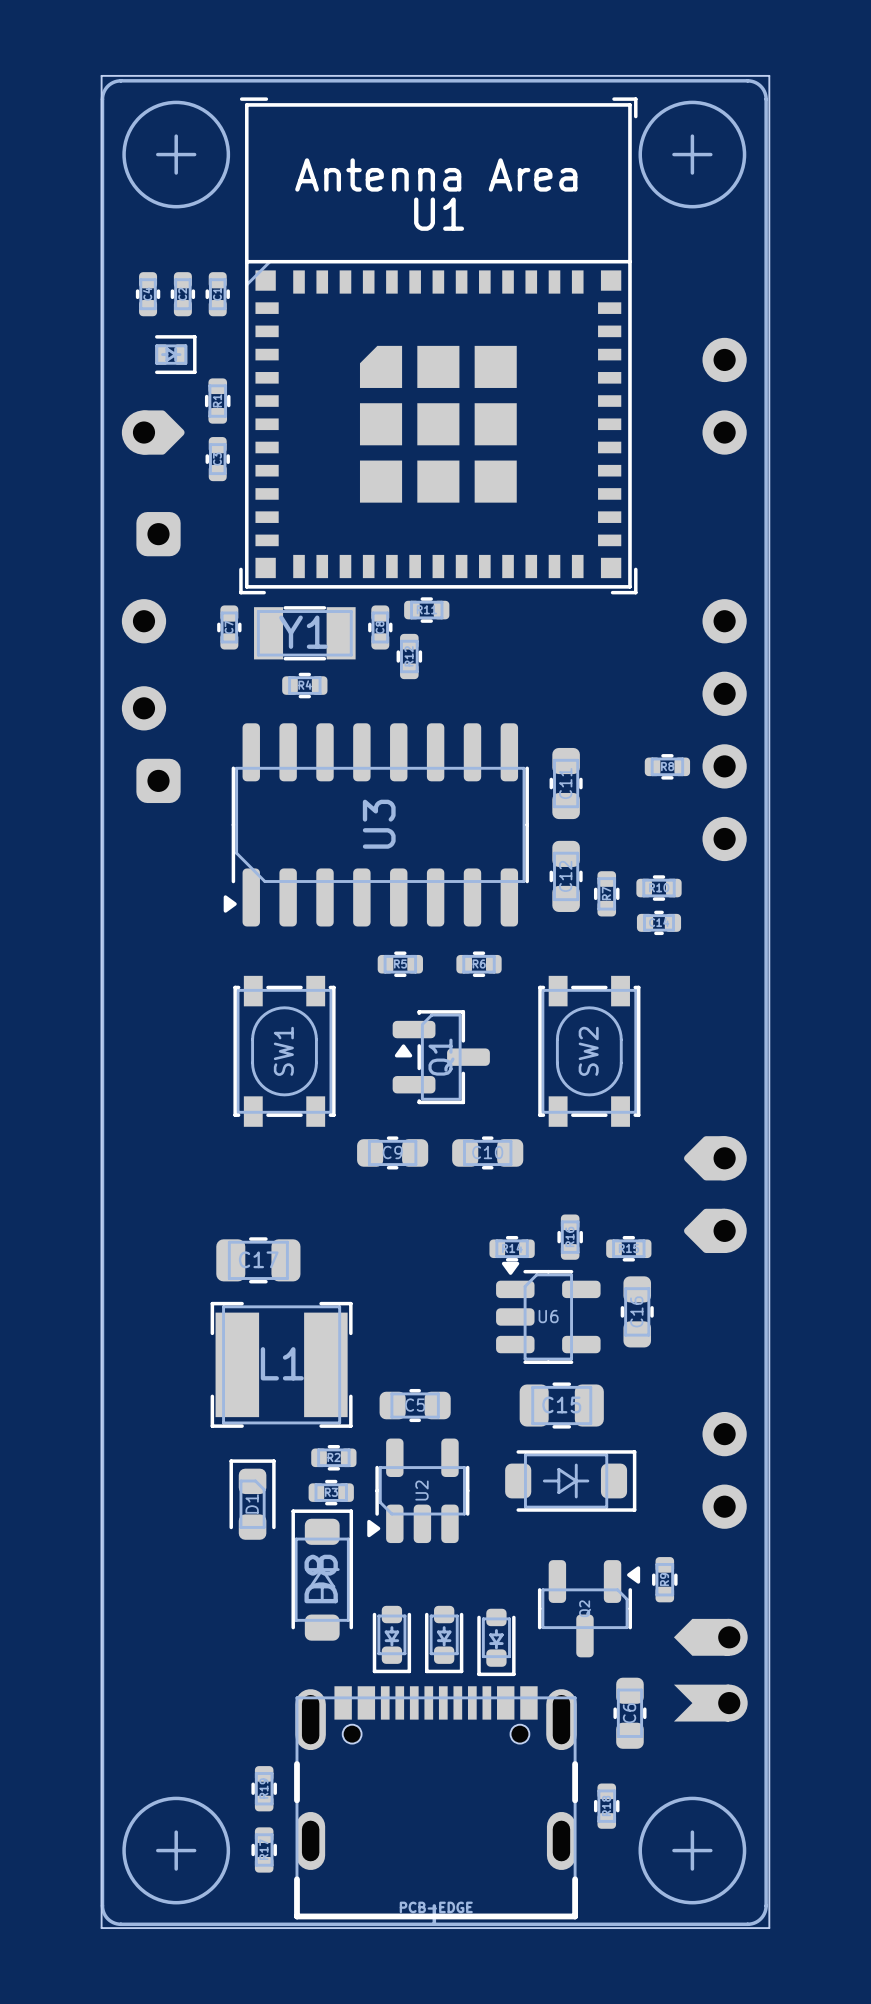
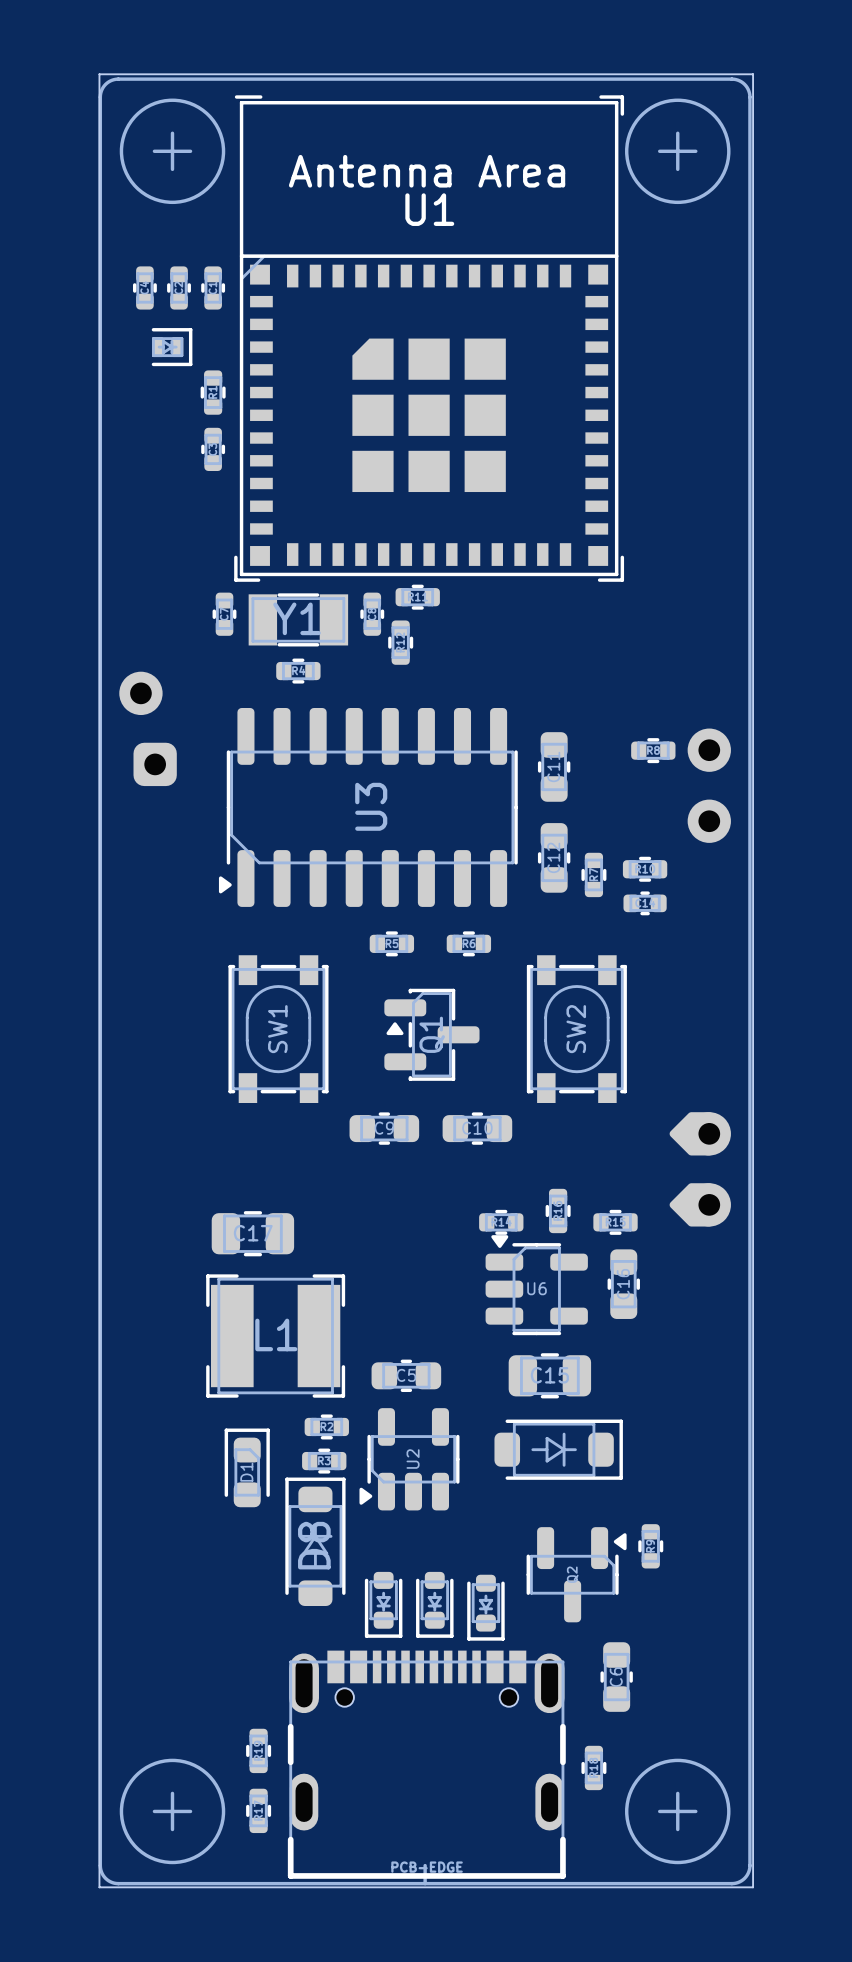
part footprint: [100, 79, 768, 1927] -> [98, 77, 752, 1886]

